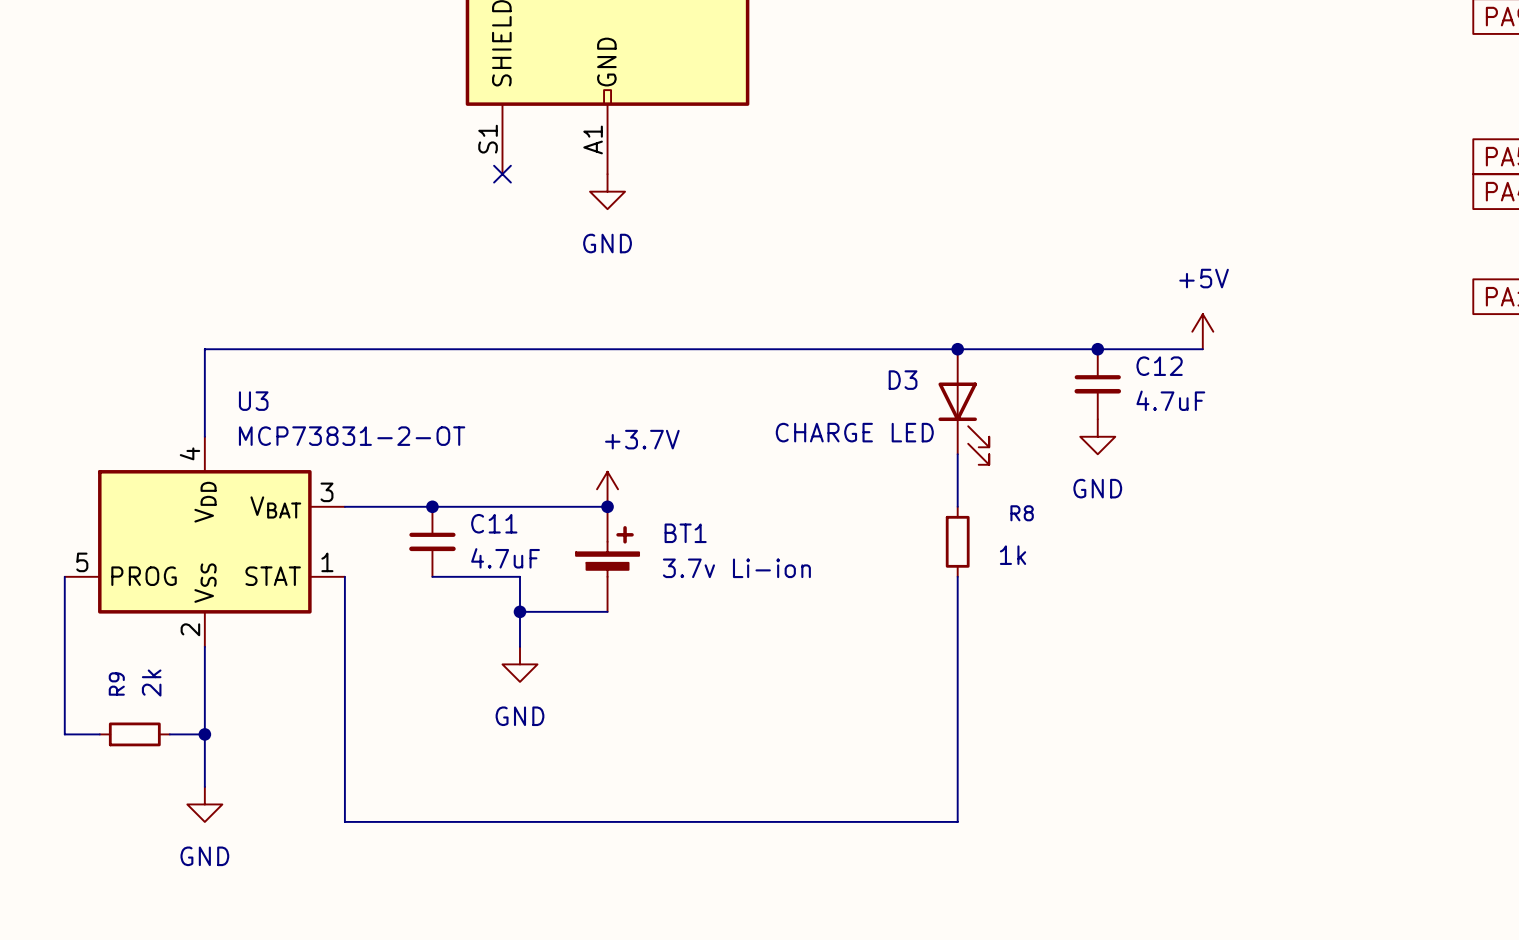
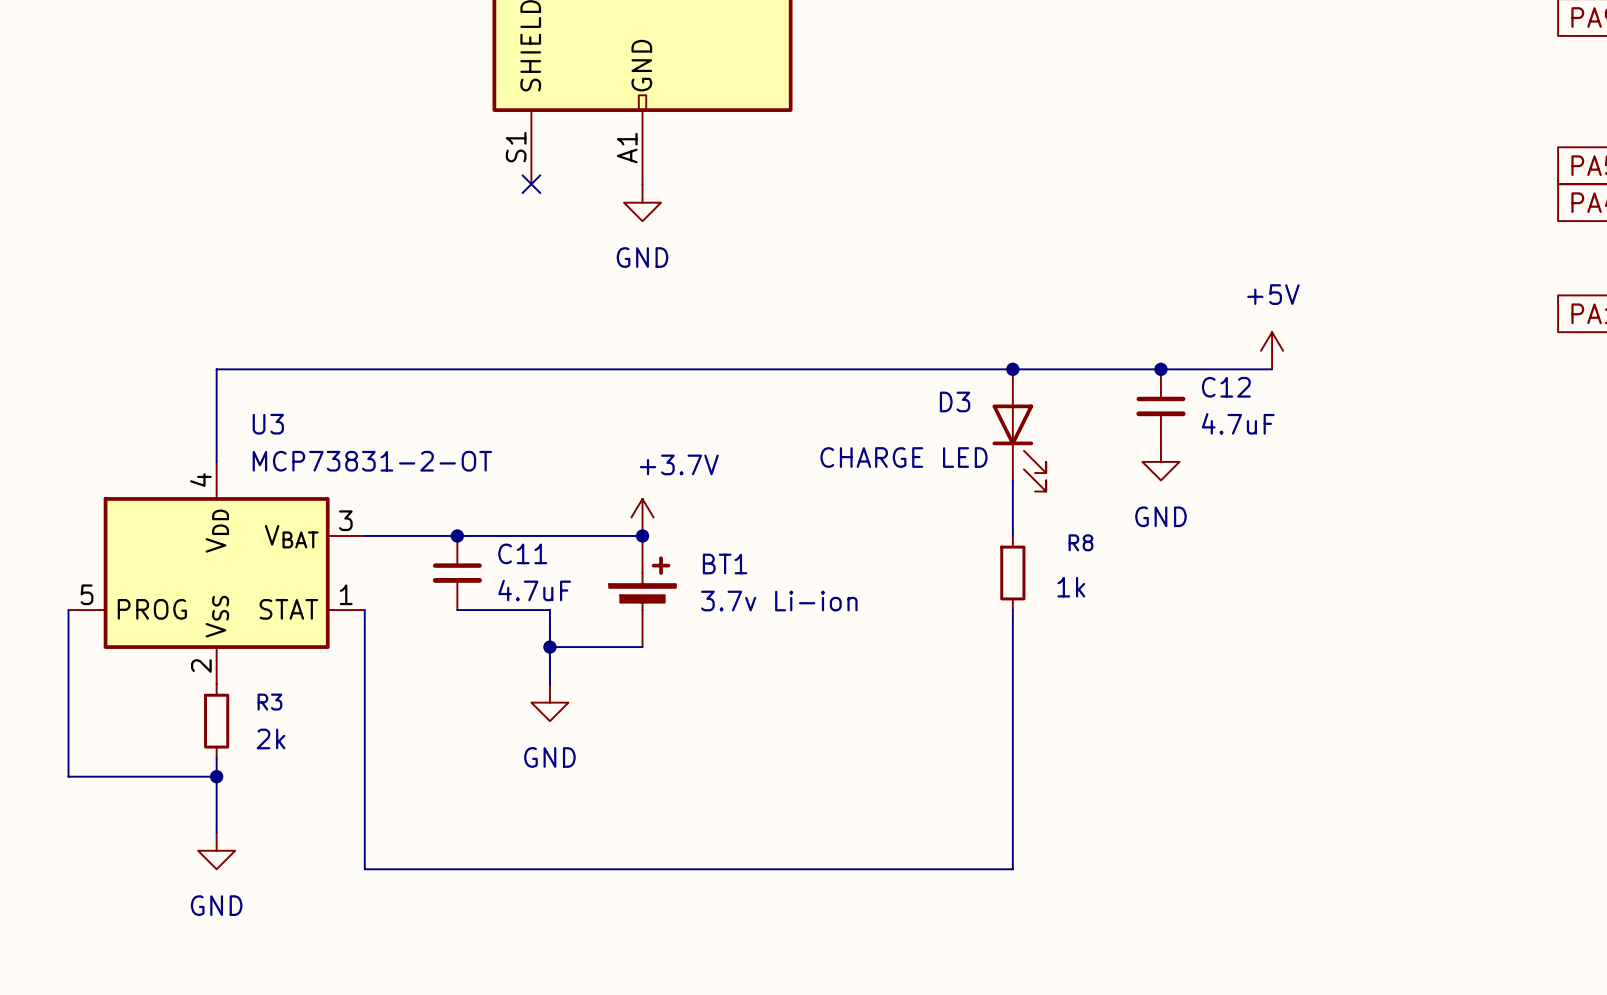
wire: (204, 646) (204, 716) -> none
R3: none -> 2k (216, 721)
wire: none -> (105, 776) (179, 776)
R9: 2k (134, 734) -> none

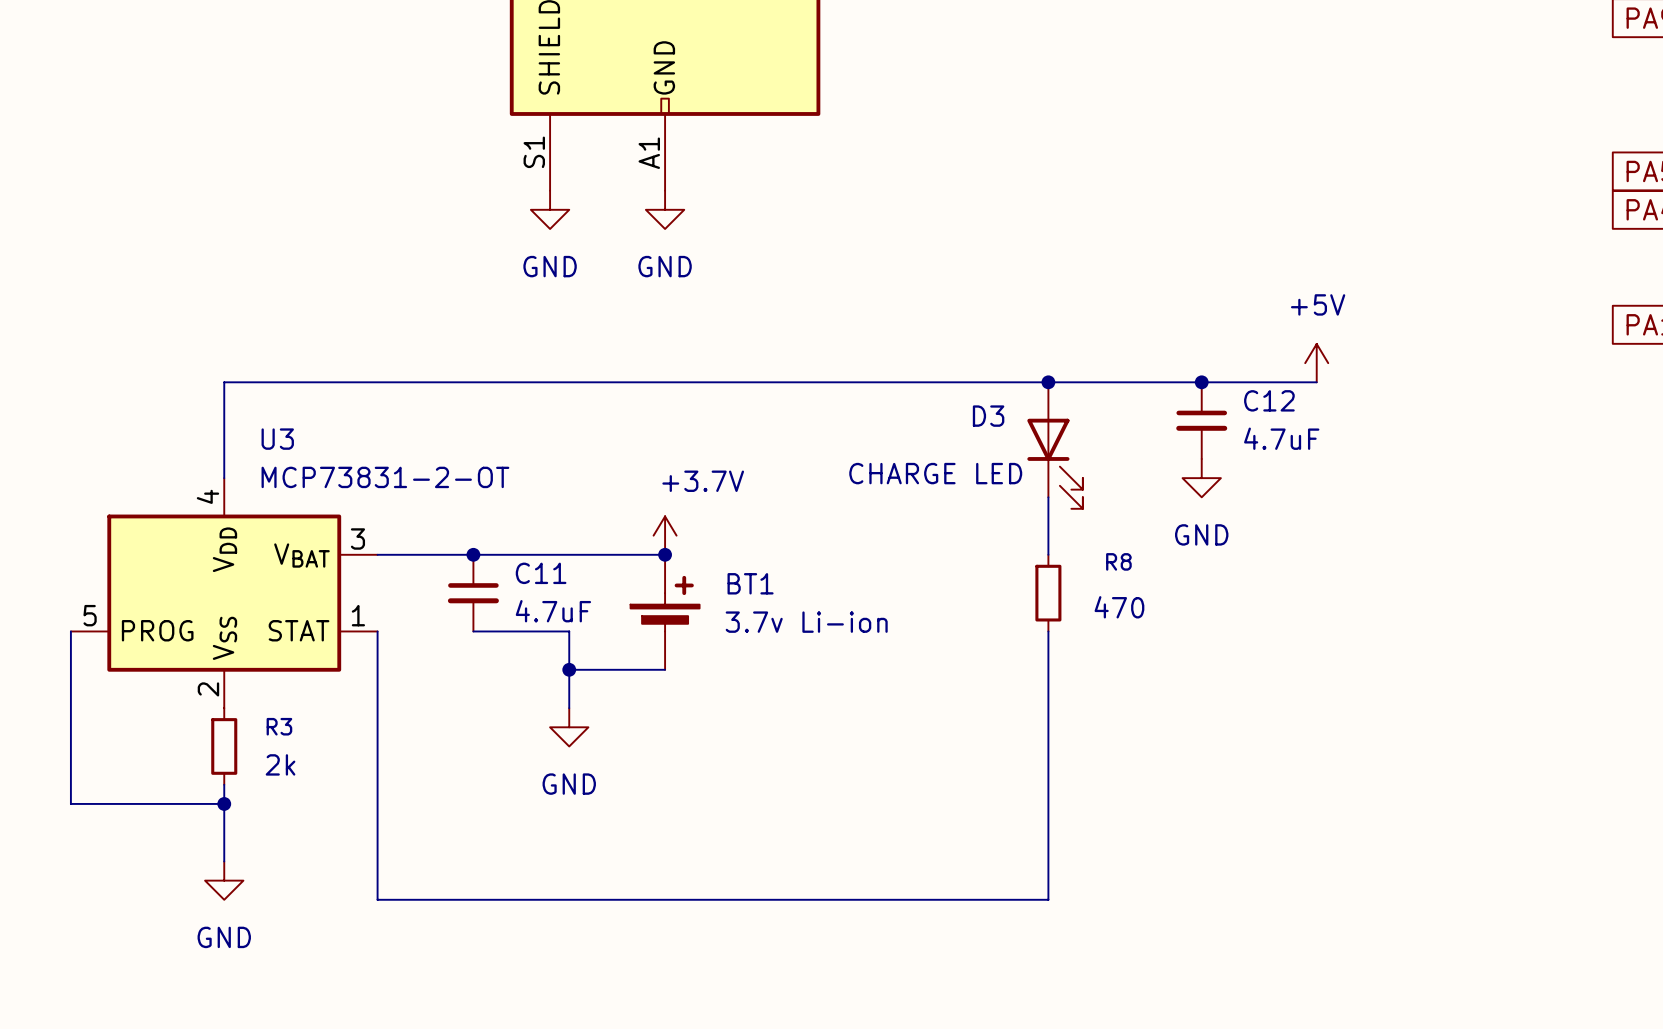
no-connect mark: (531, 184) -> none
power symbol: none -> GND (550, 209)
R8 value: 1k (1071, 587) -> 470 (1119, 607)

